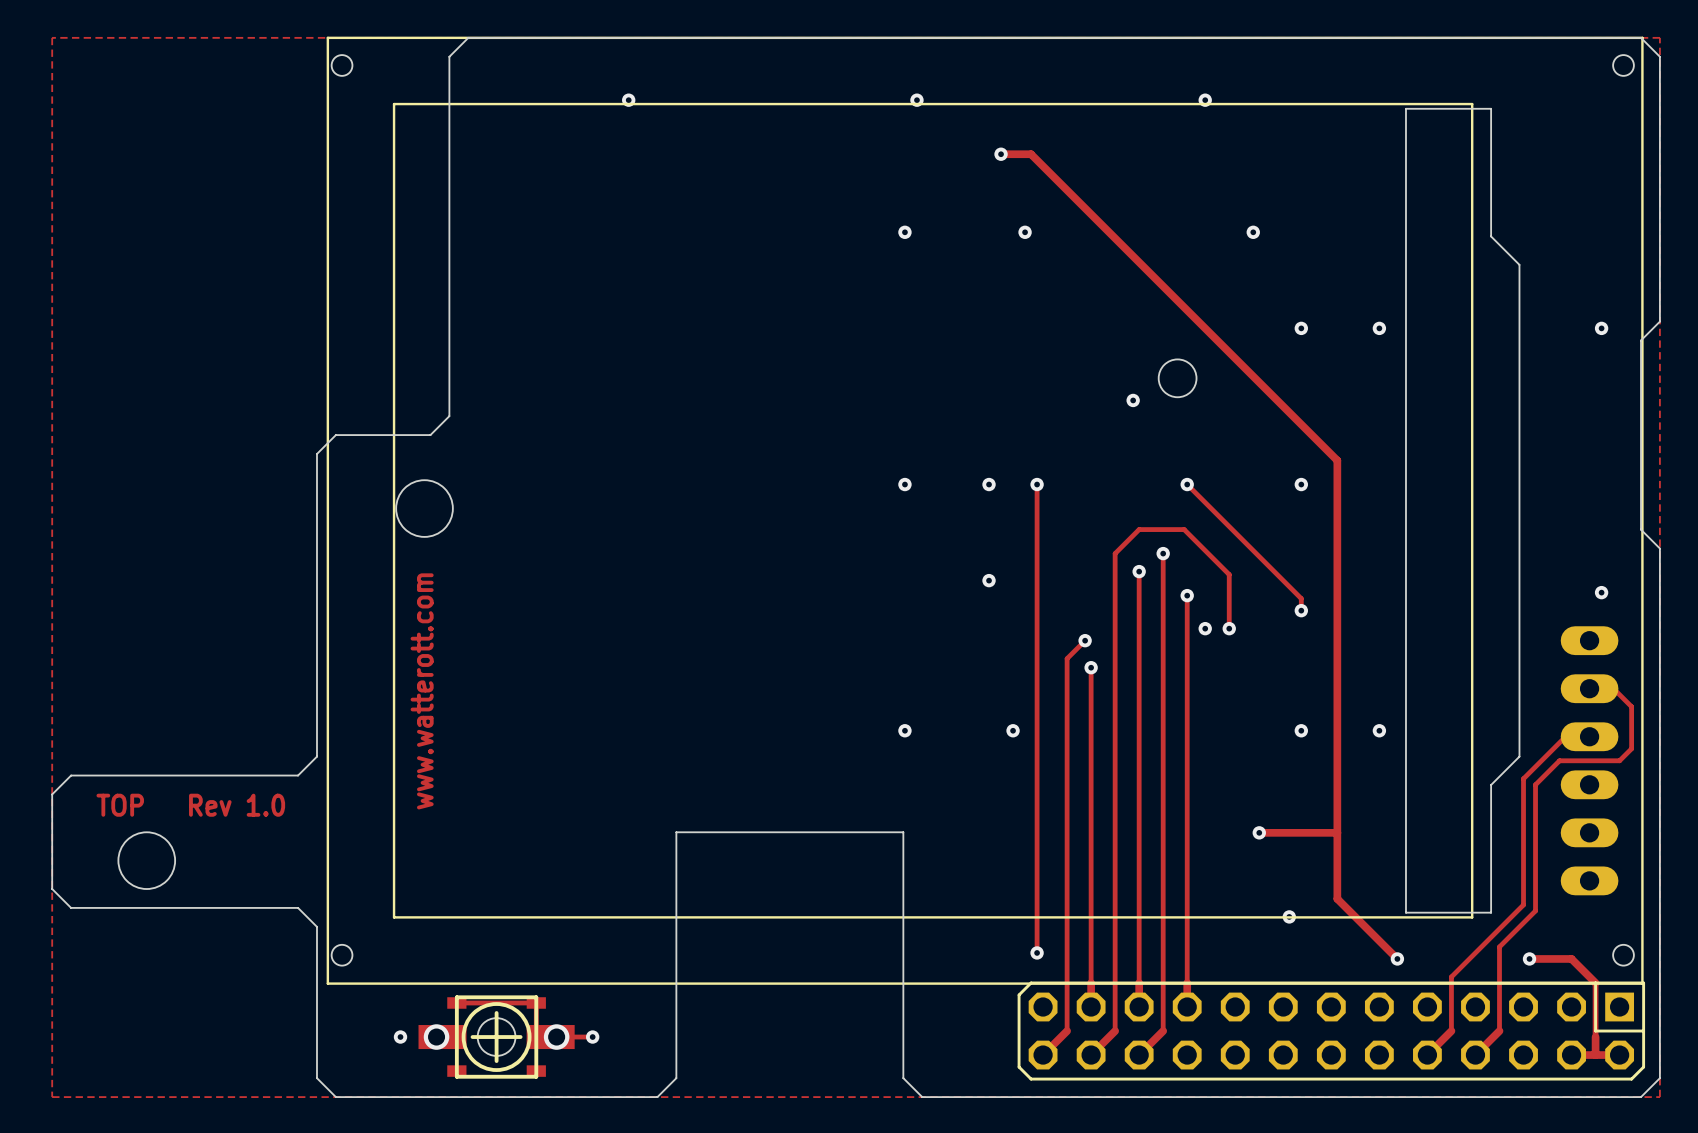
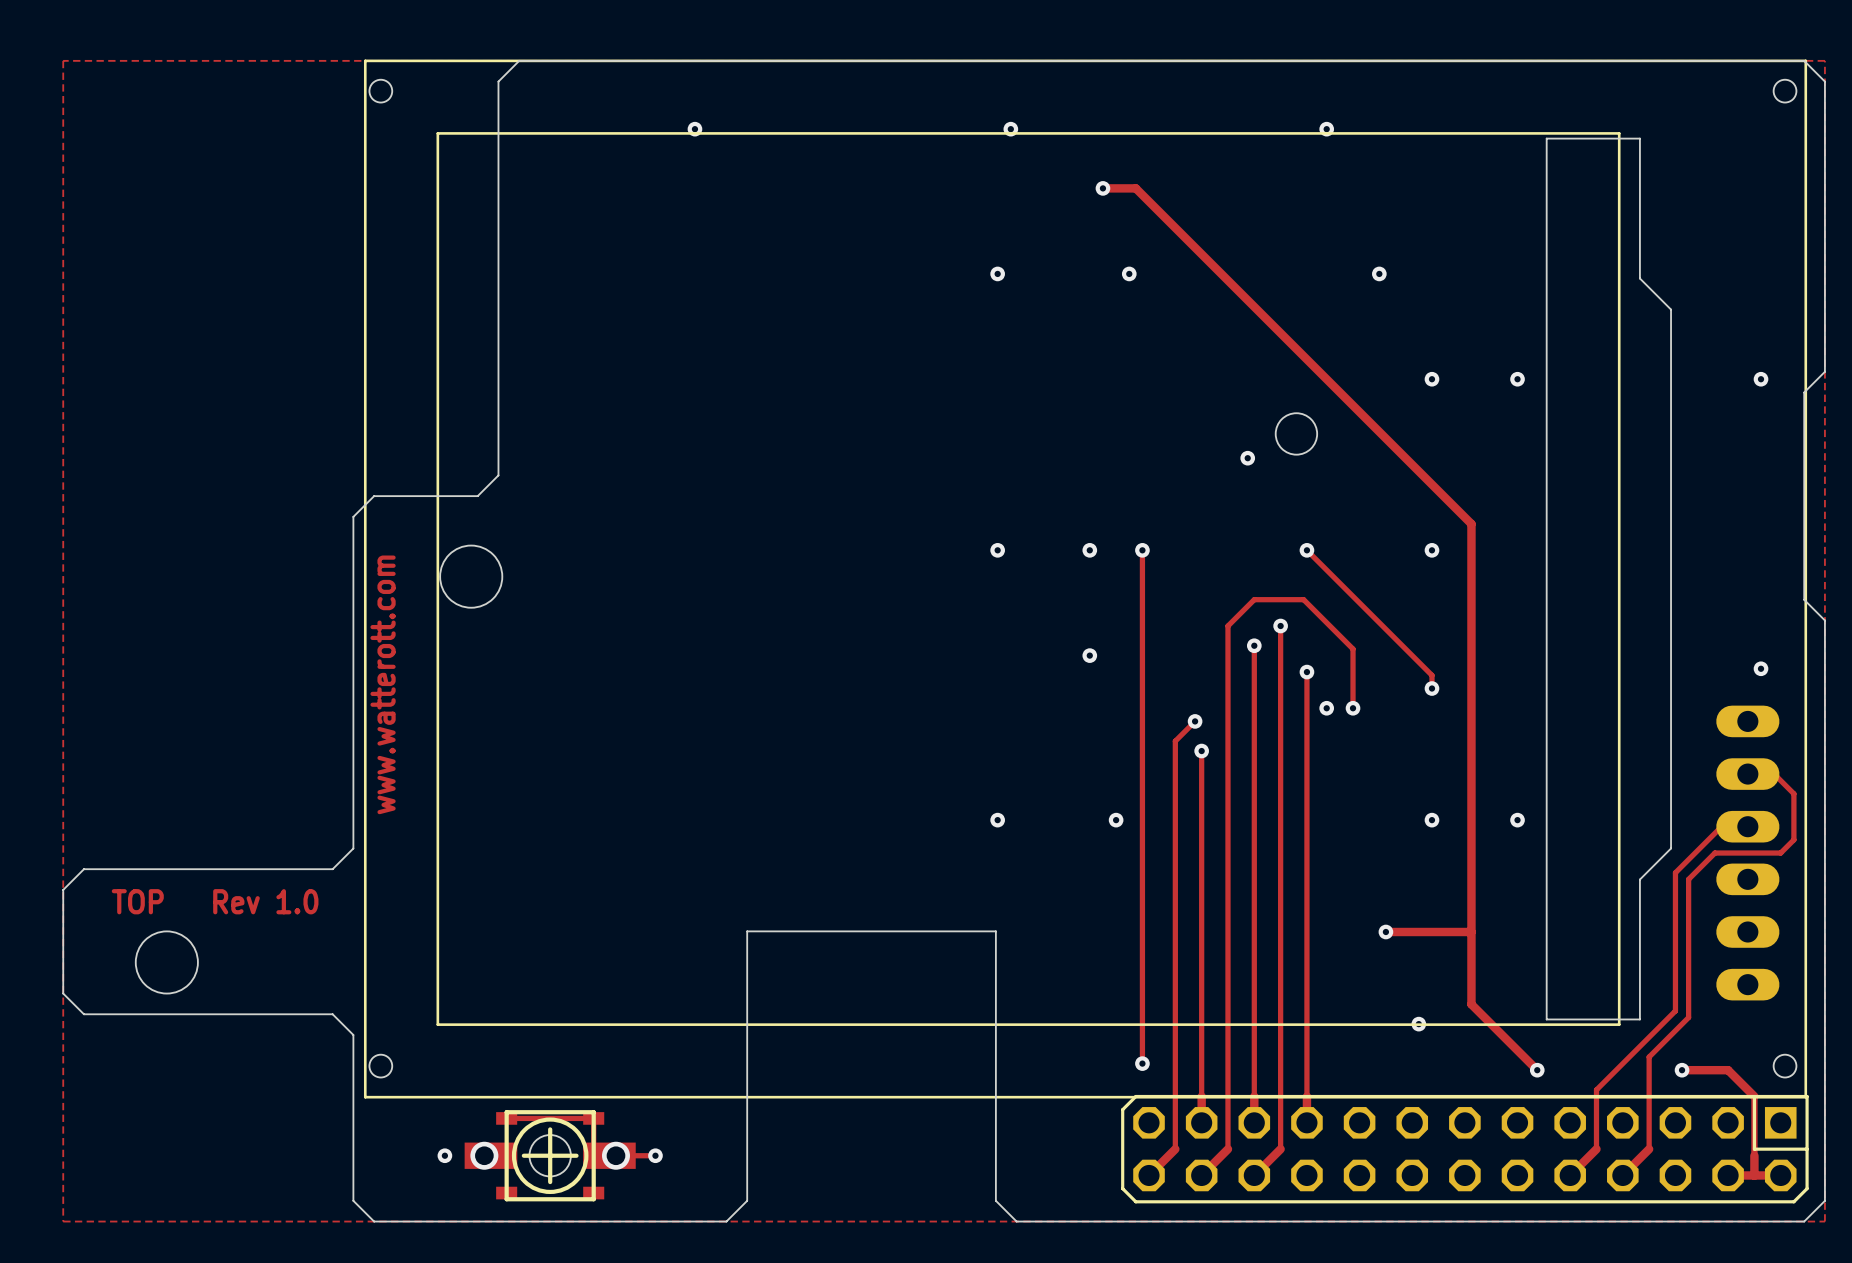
text position: www.watterott.com (422, 691) -> www.watterott.com (383, 684)

